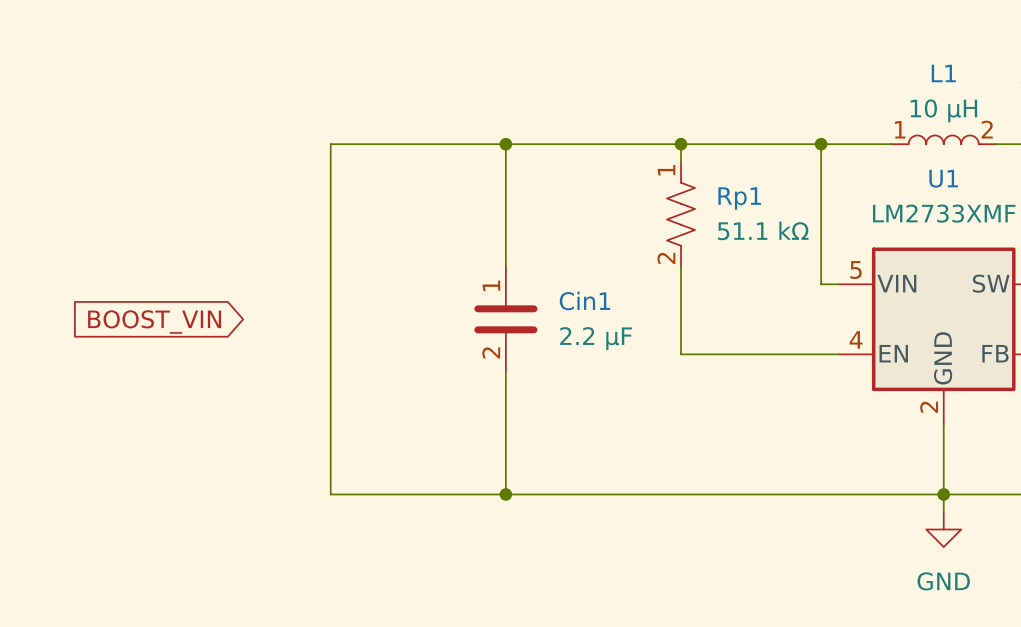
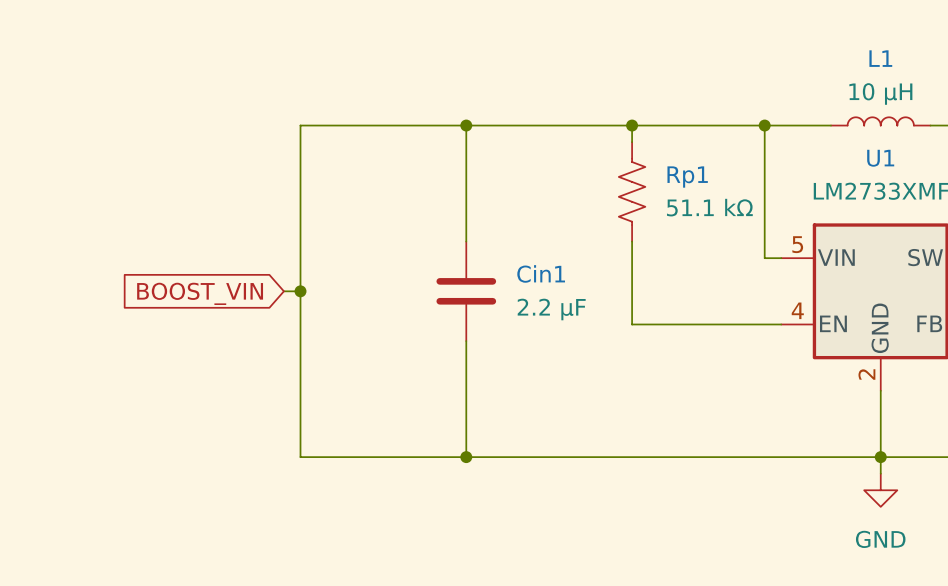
L1 pin number: 1 (900, 129) -> none
L1 pin number: 2 (987, 129) -> none
Rp1 pin number: 1 (666, 170) -> none
Rp1 pin number: 2 (666, 258) -> none
Cin1 pin number: 1 (491, 285) -> none
wire: none -> (283, 291) (300, 291)
junction: none -> (300, 291)
global label position: BOOST_VIN (154, 322) -> BOOST_VIN (200, 293)
Cin1 pin number: 2 (491, 352) -> none

